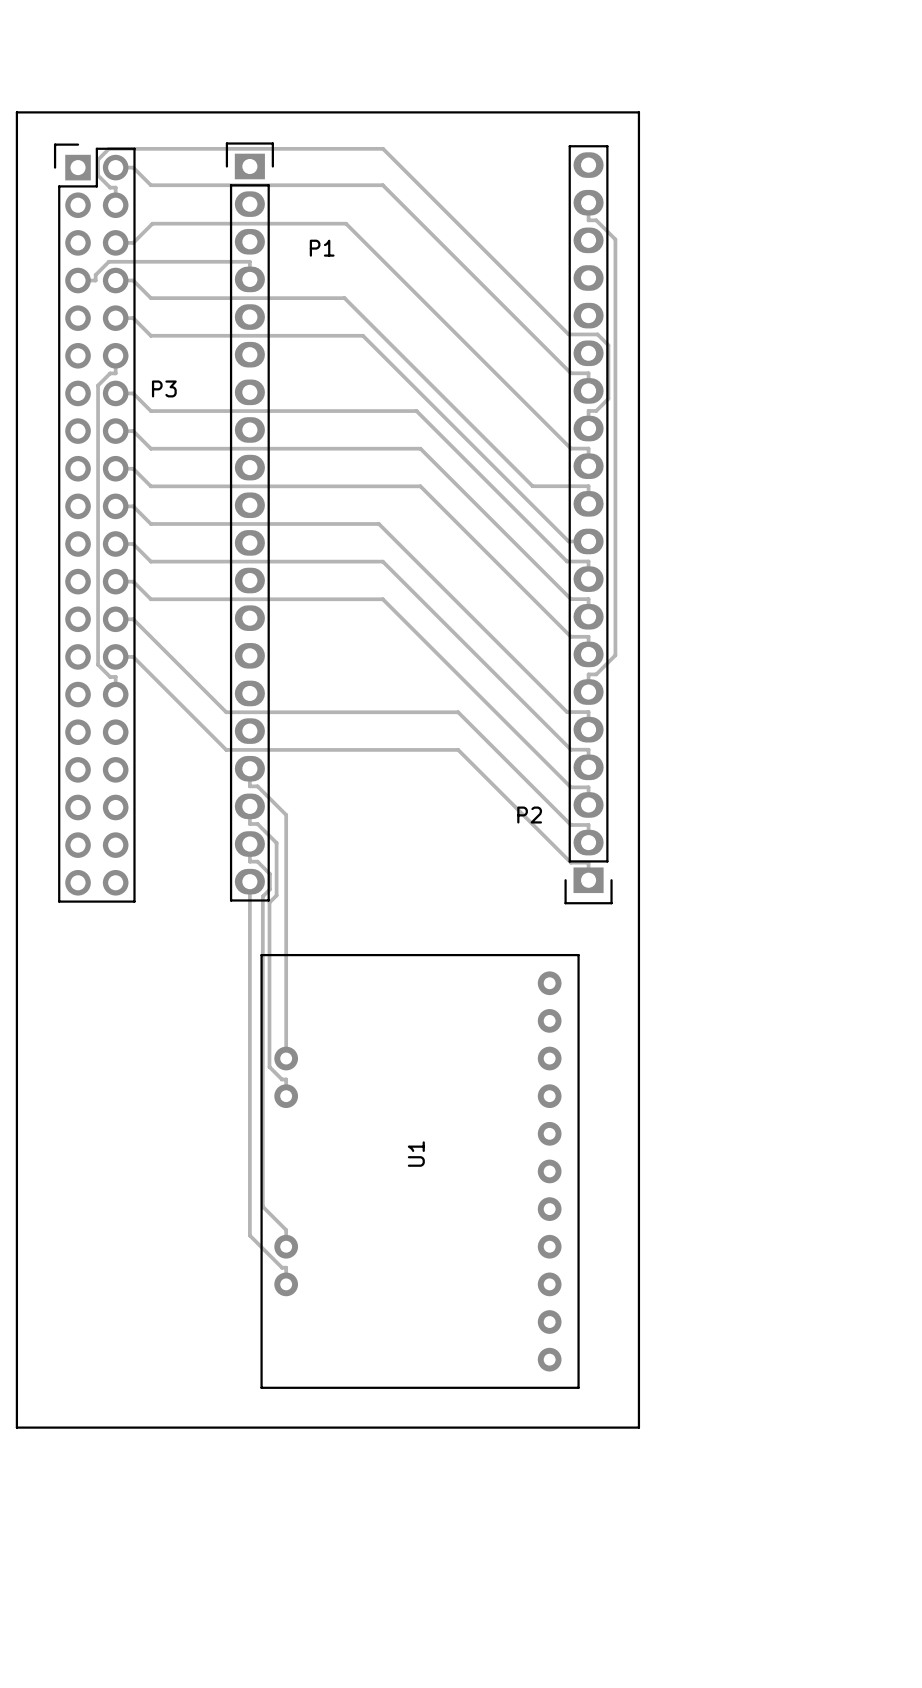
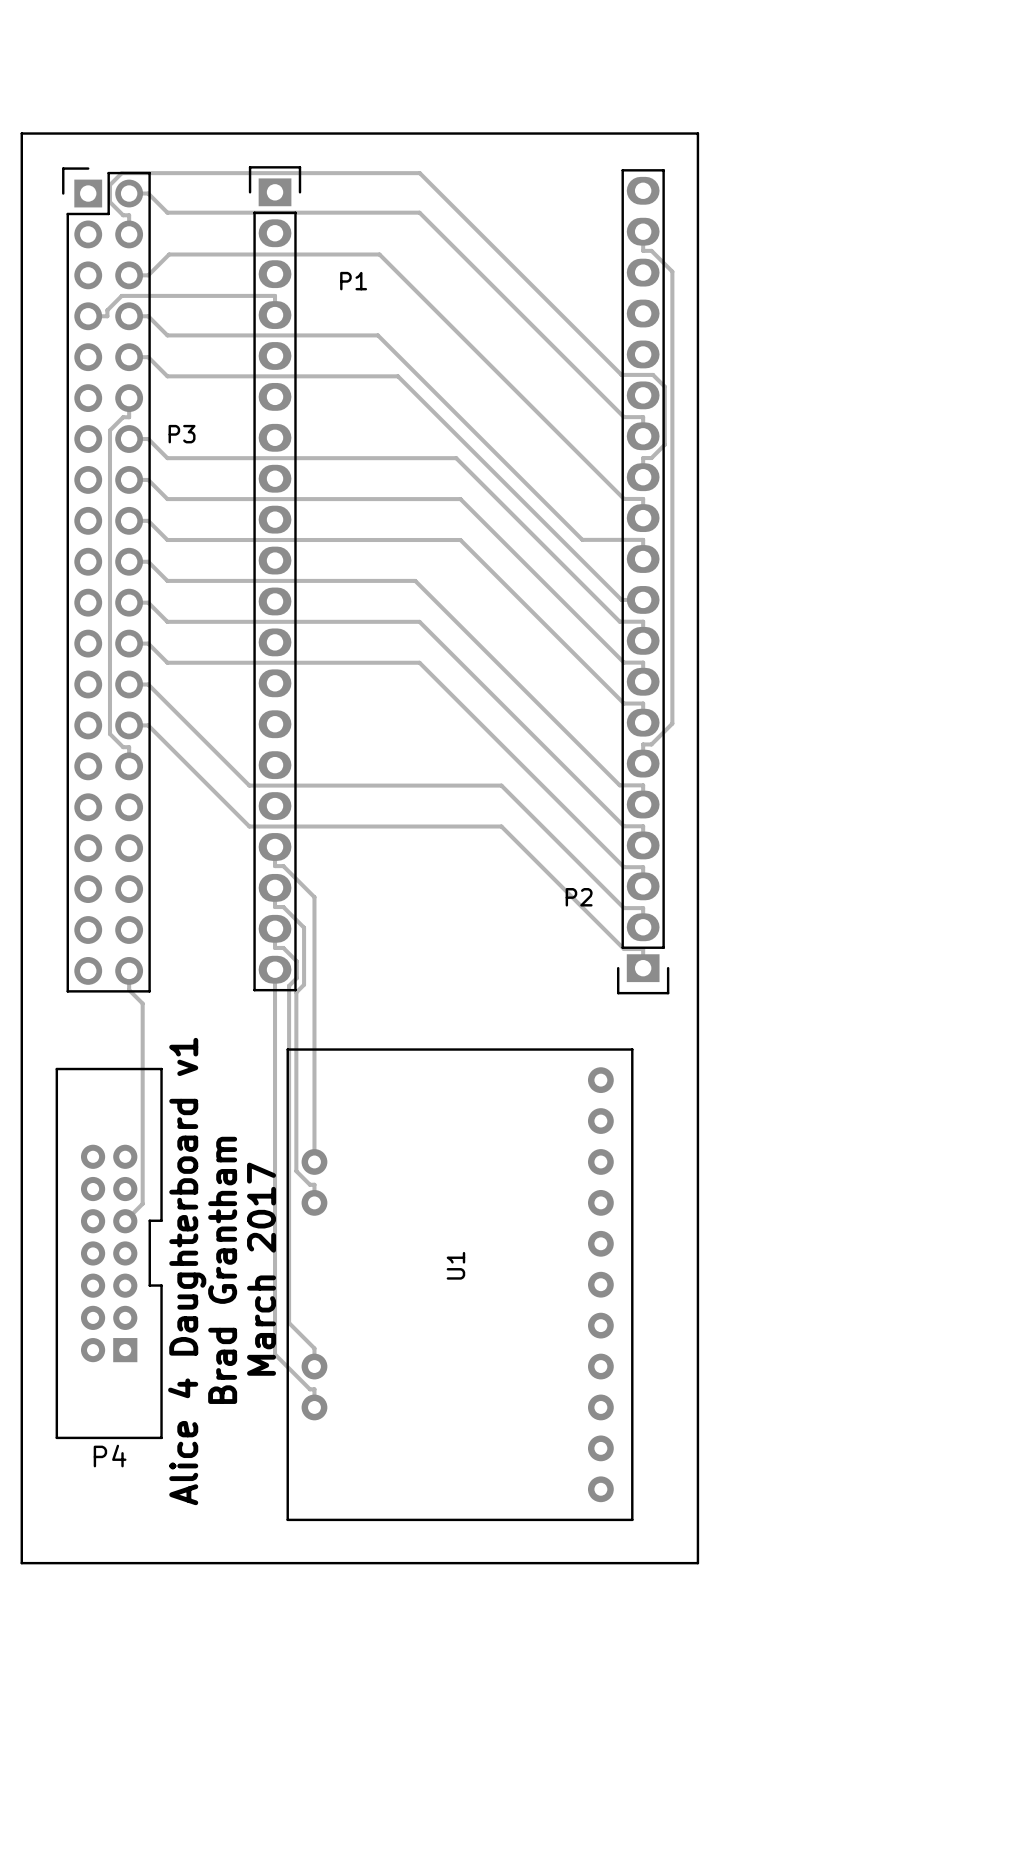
track: none -> (129, 970) (129, 990) (142, 1003) (142, 1203) (125, 1221)
P4: none -> (109, 1253)
text: none -> March 2017 (261, 1269)
text: none -> Brad Grantham (222, 1270)
text: none -> Alice 4 Daughterboard v1 (187, 1271)

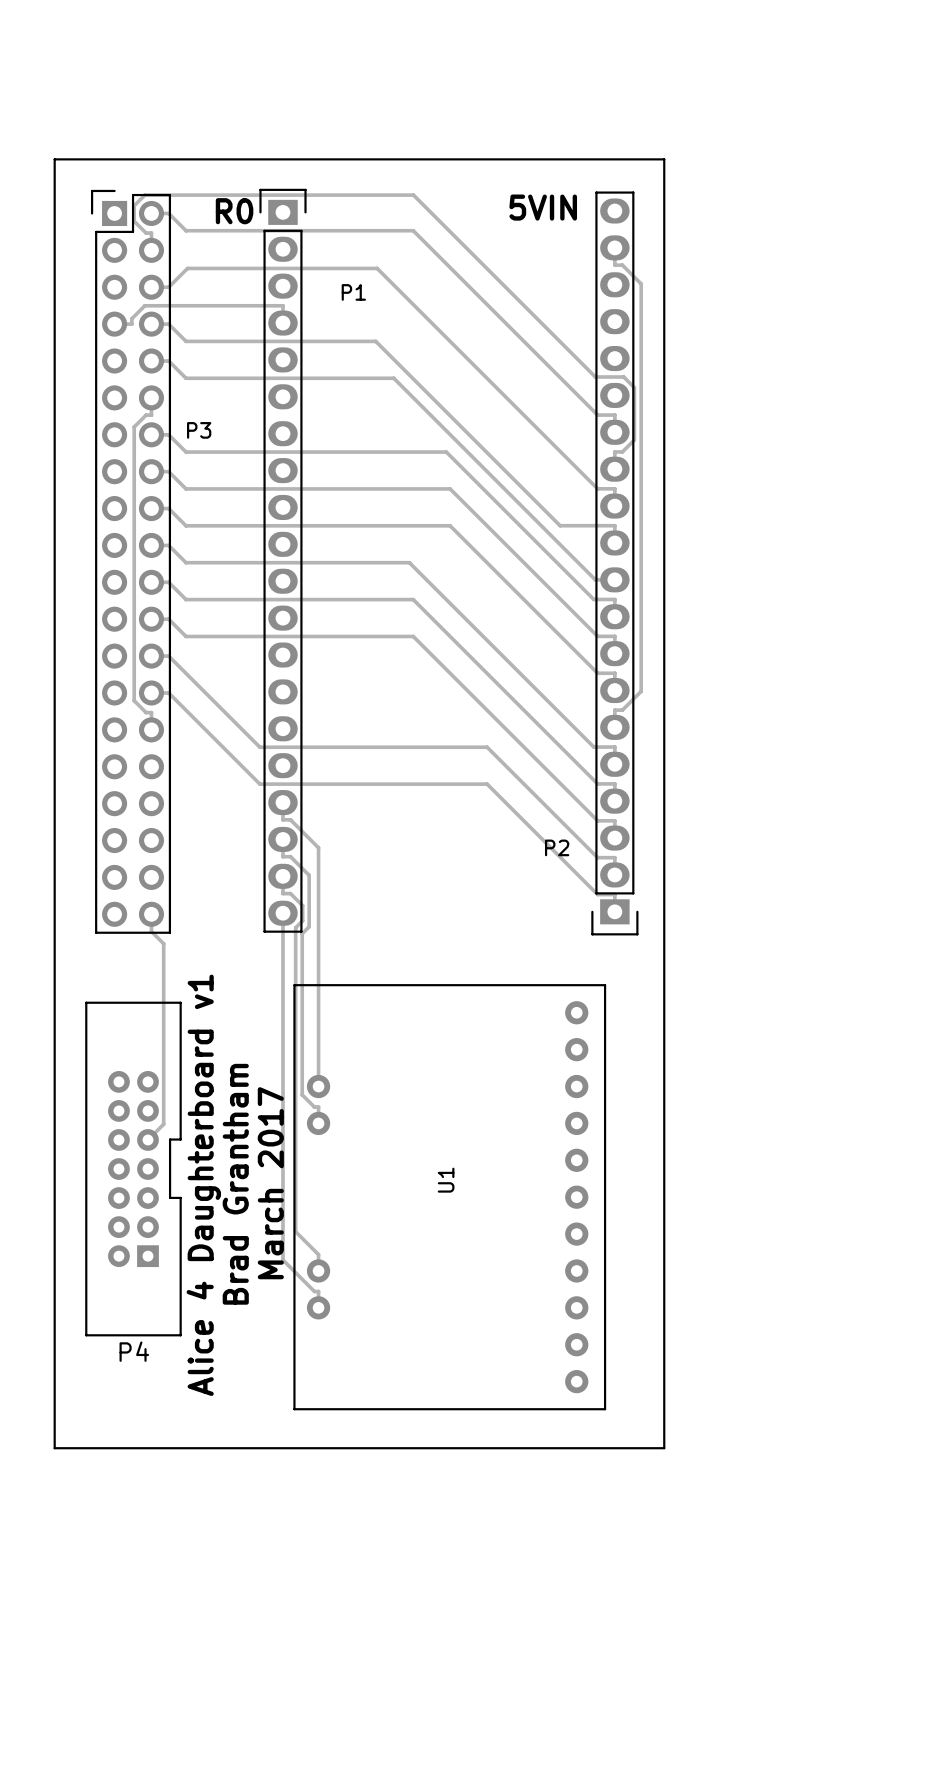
text: none -> 5VIN (543, 207)
text: none -> R0 (234, 211)

